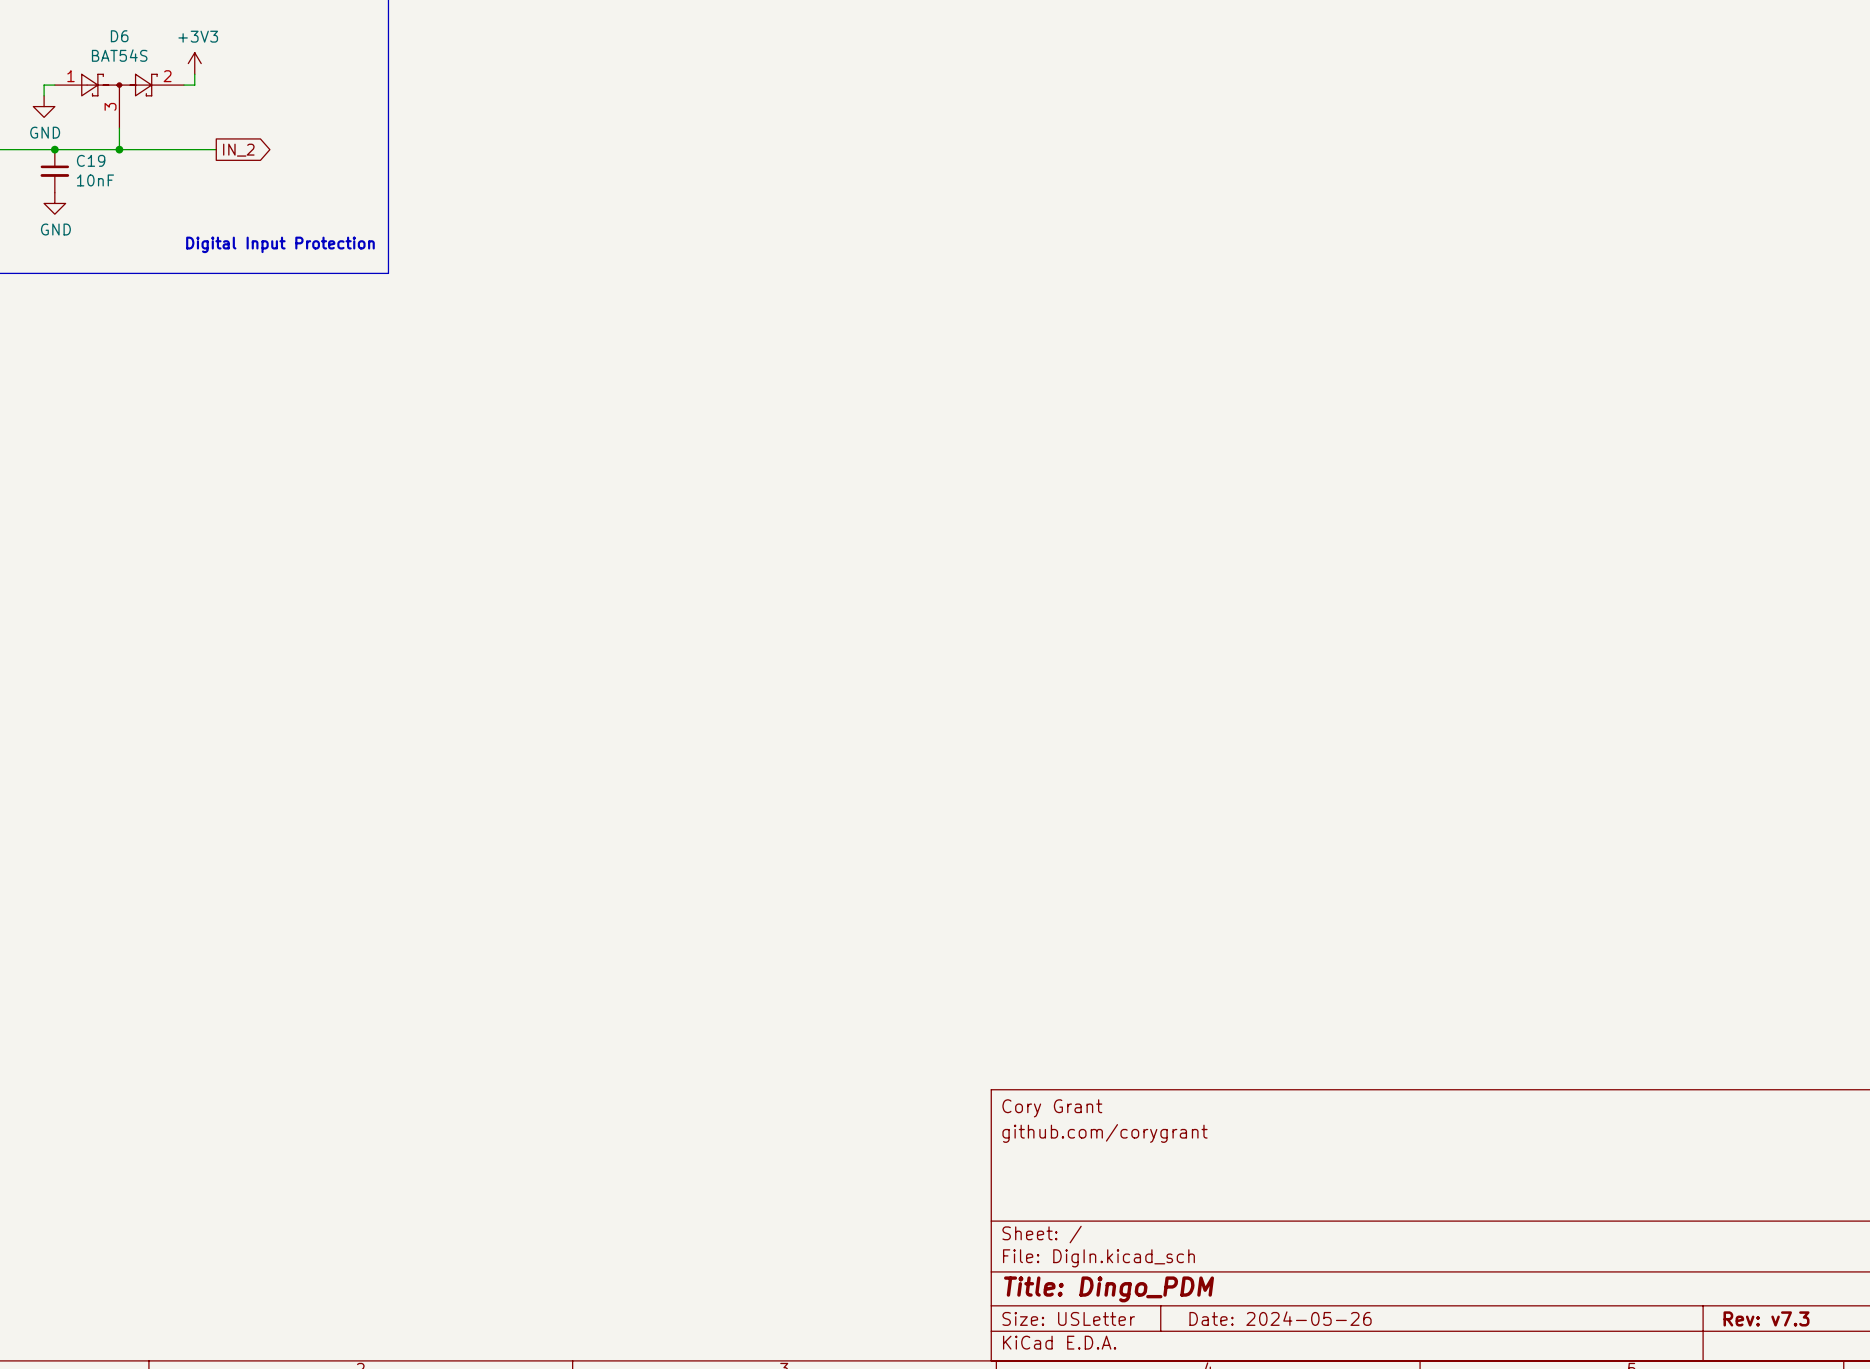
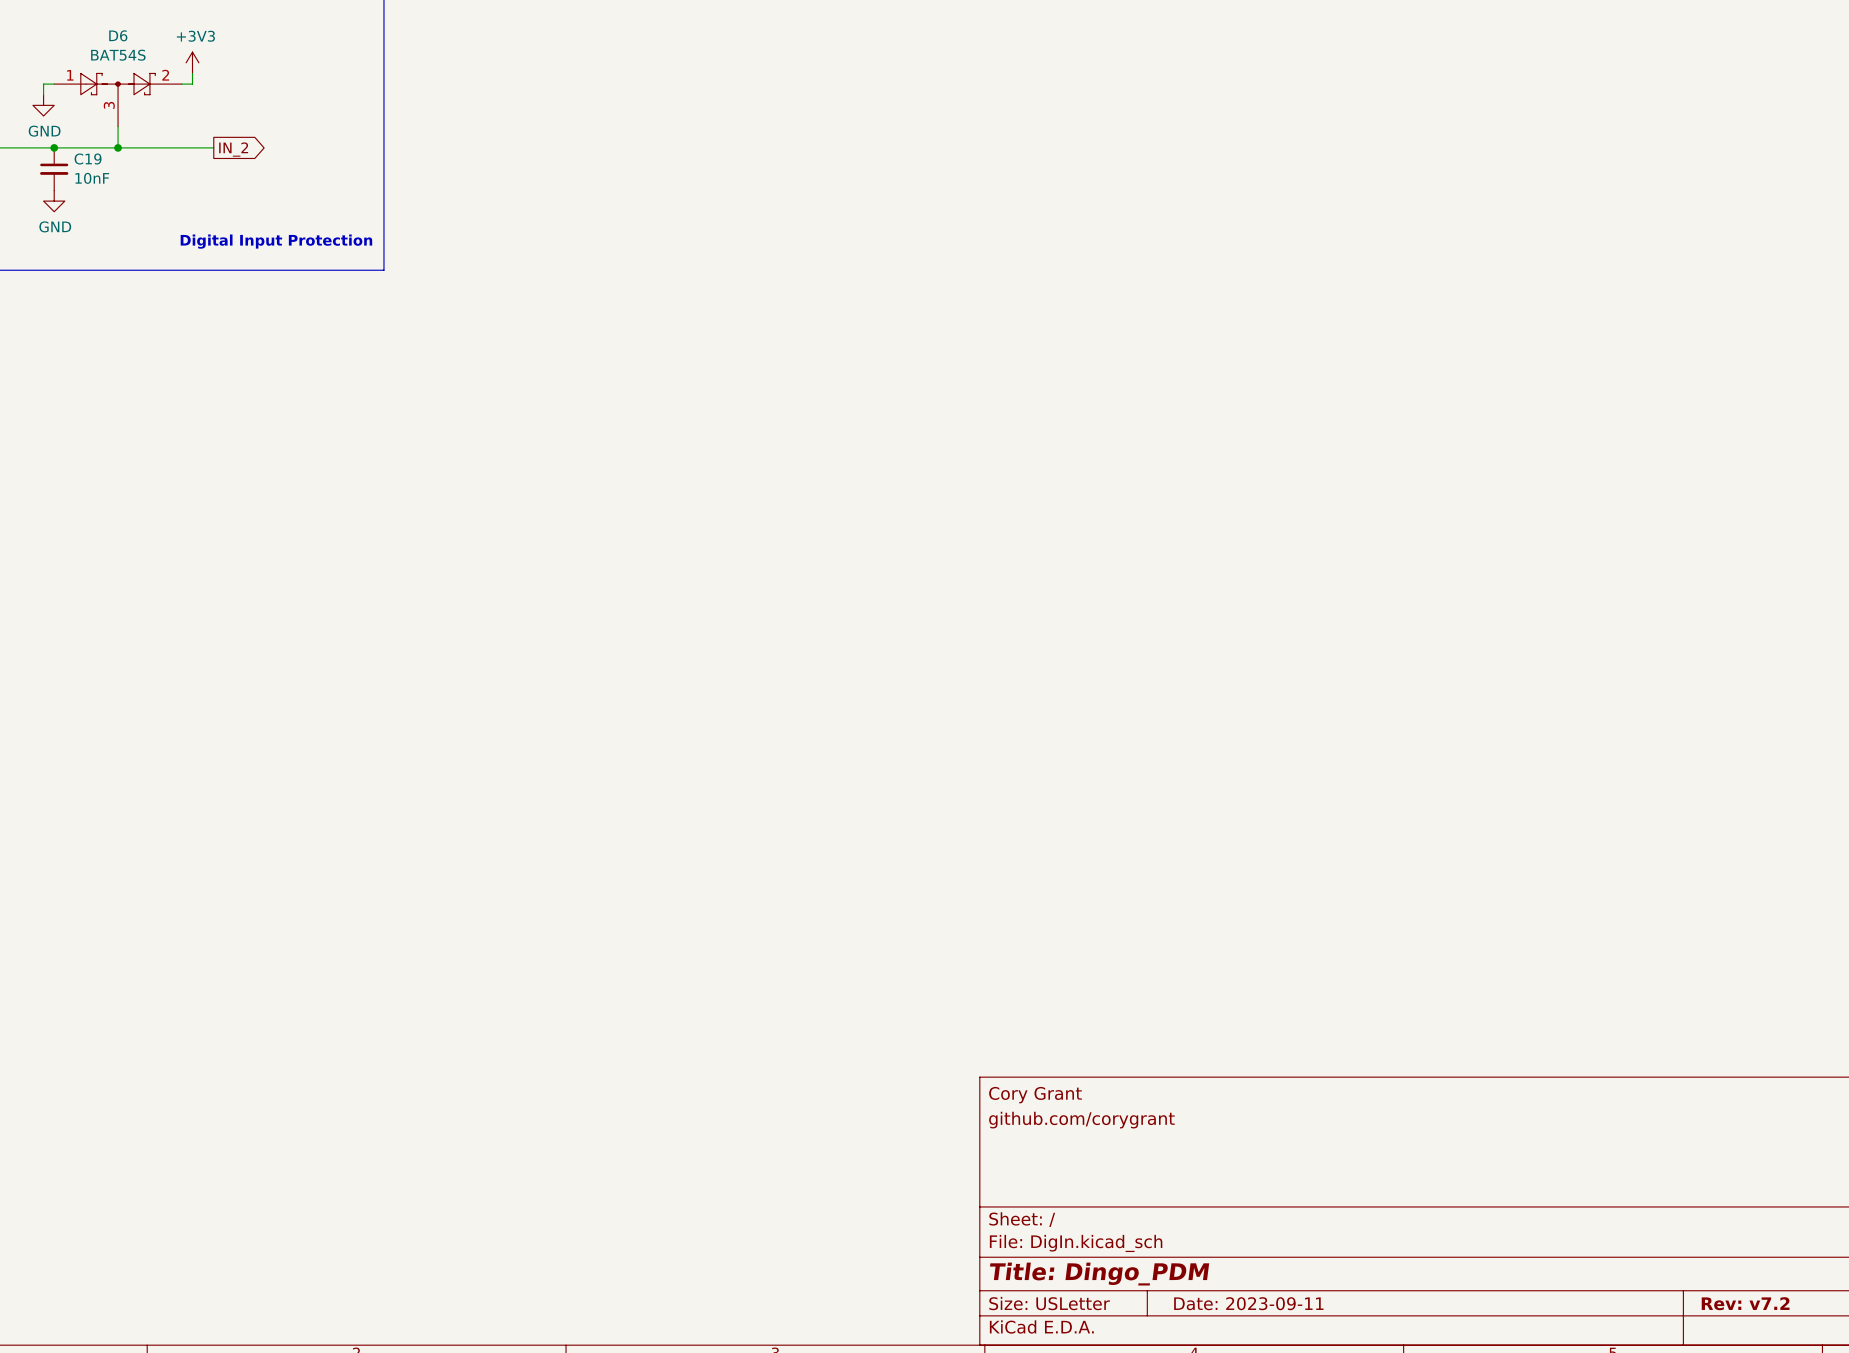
title block: Date: 2024-05-26 (1280, 1318) -> Date: 2023-09-11 (1248, 1303)
title block: Rev: v7.3 (1766, 1318) -> Rev: v7.2 (1745, 1303)

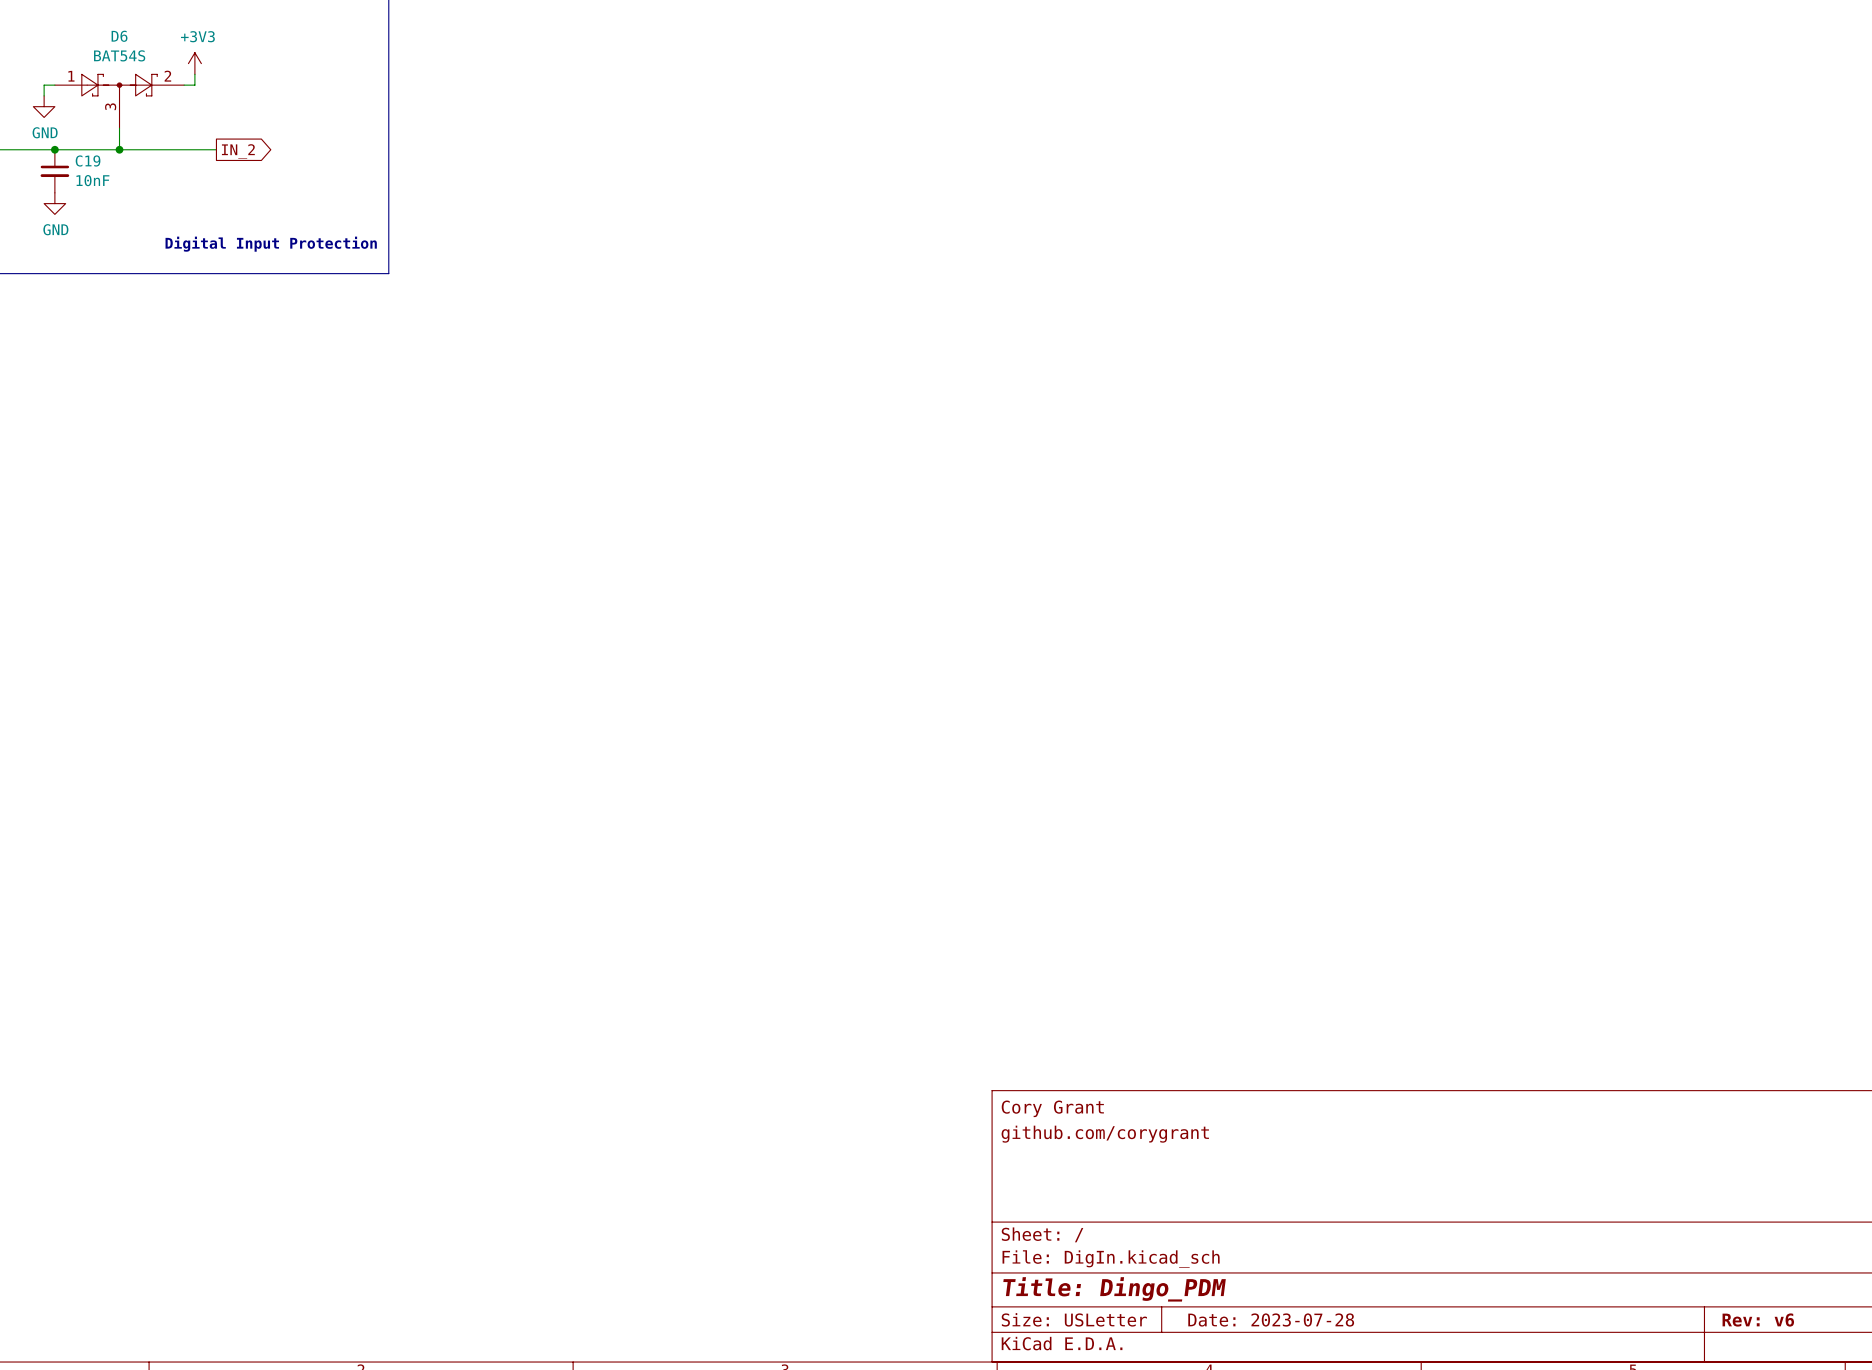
title block: Date: 2023-09-11 (1248, 1303) -> Date: 2023-07-28 (1271, 1319)
title block: Rev: v7.2 (1745, 1303) -> Rev: v6 (1758, 1320)

